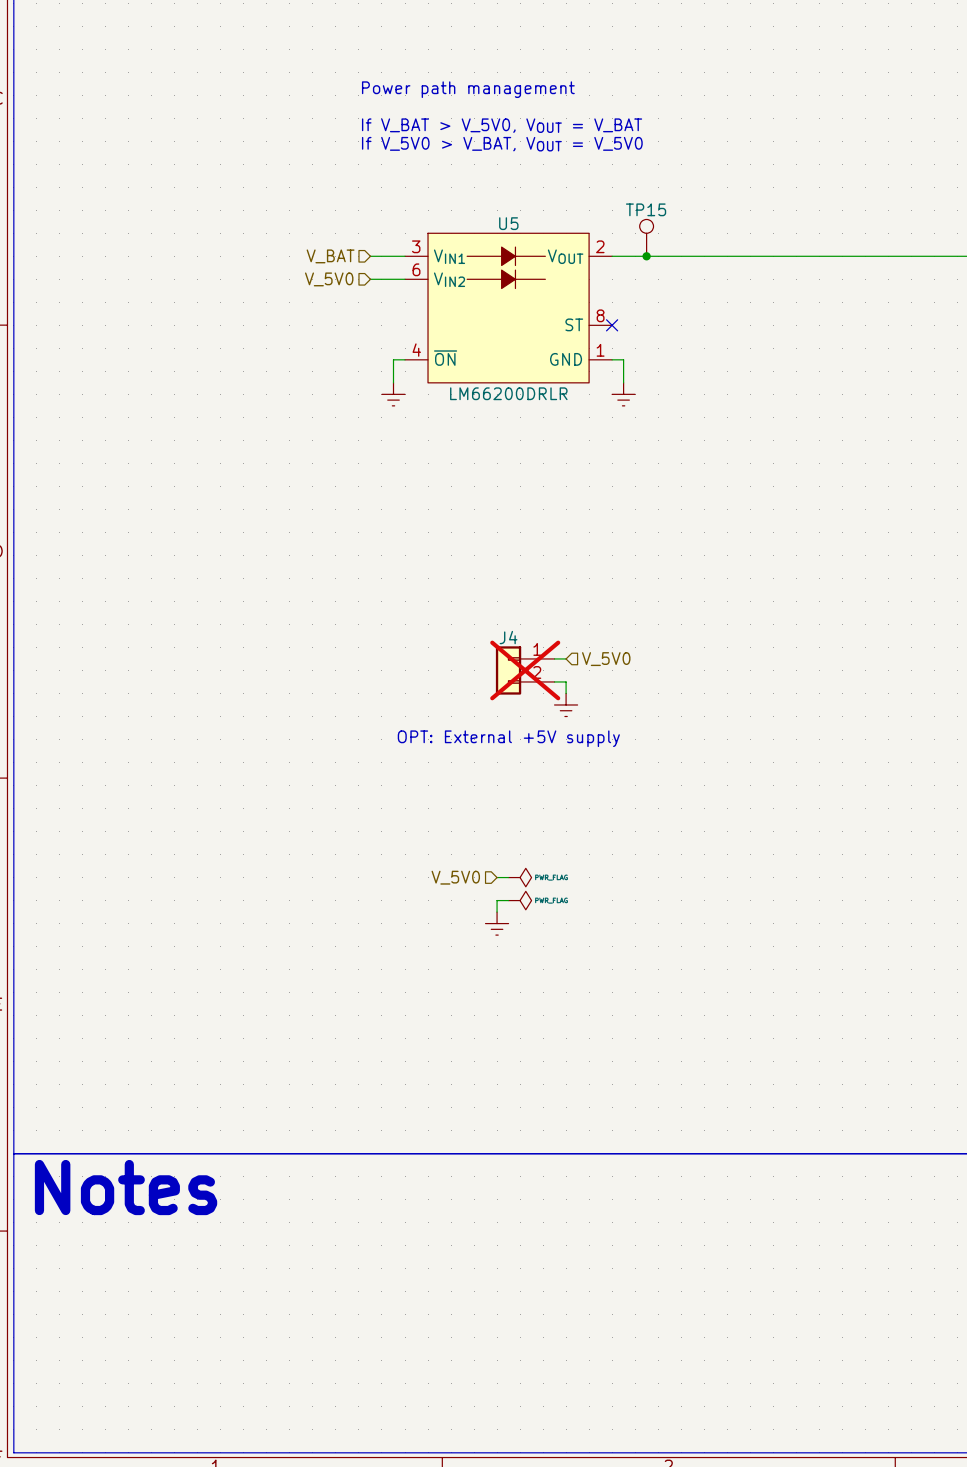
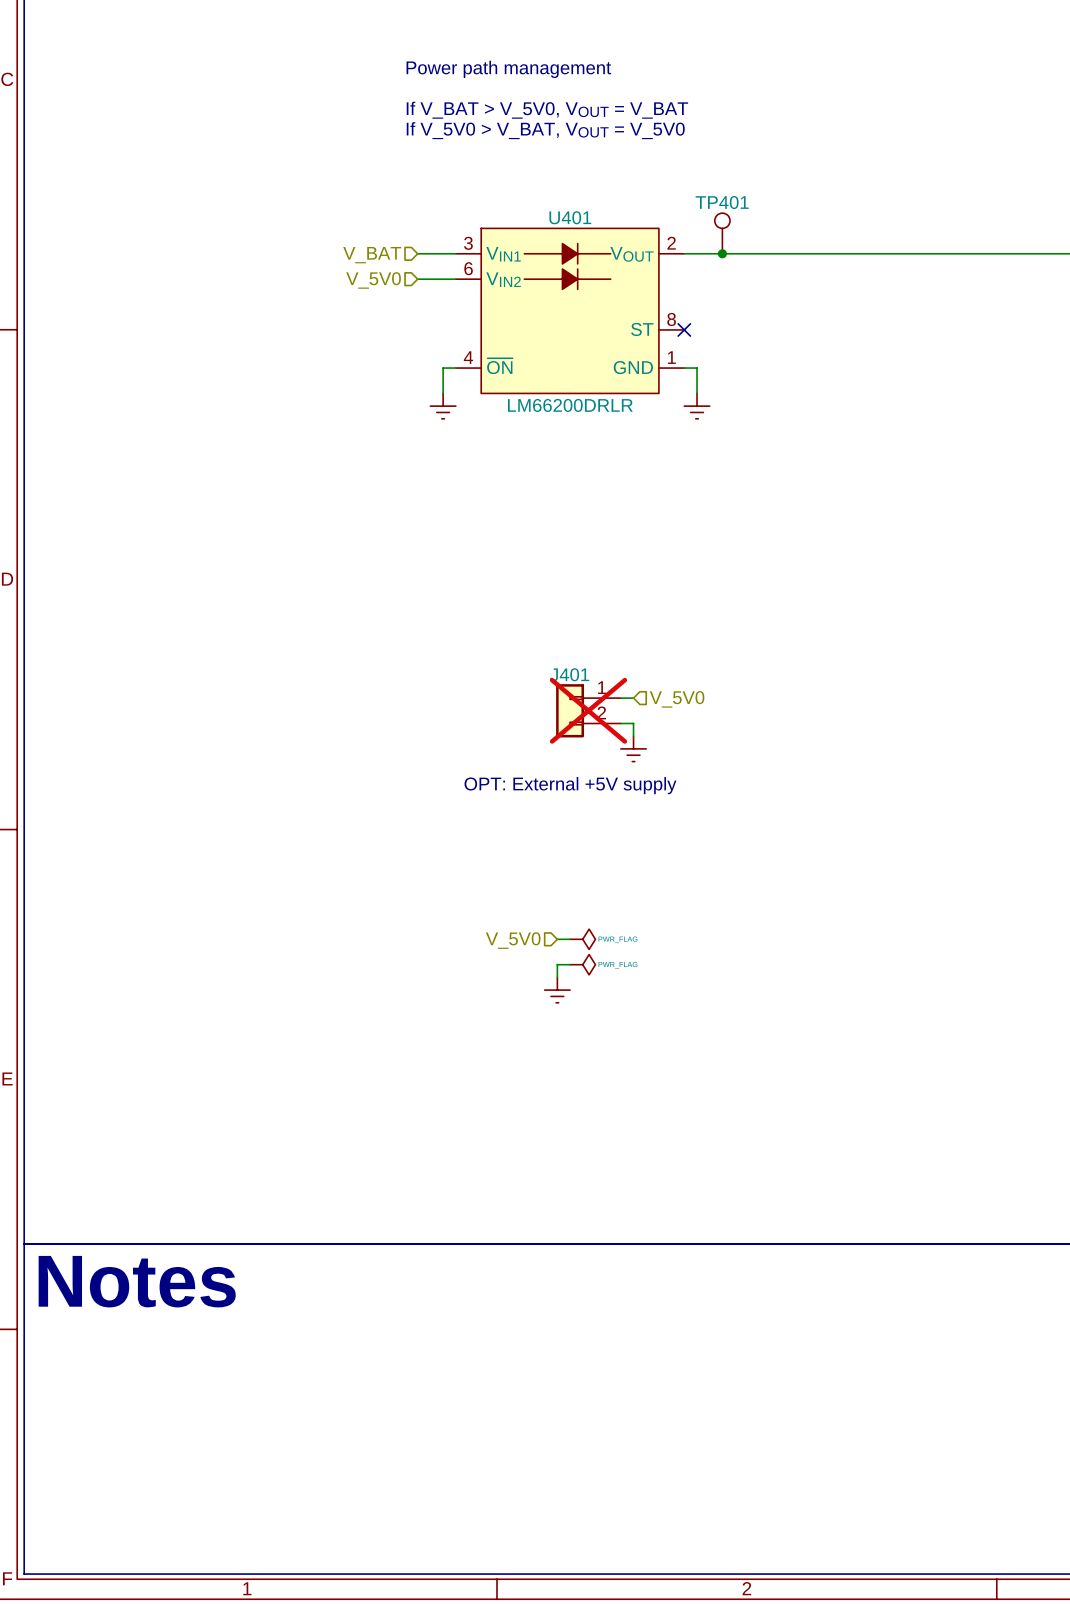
TP15 name: TP15 (646, 209) -> TP401 (722, 202)
U5 name: U5 (508, 223) -> U401 (570, 217)
J4 name: J4 (508, 637) -> J401 (569, 674)

